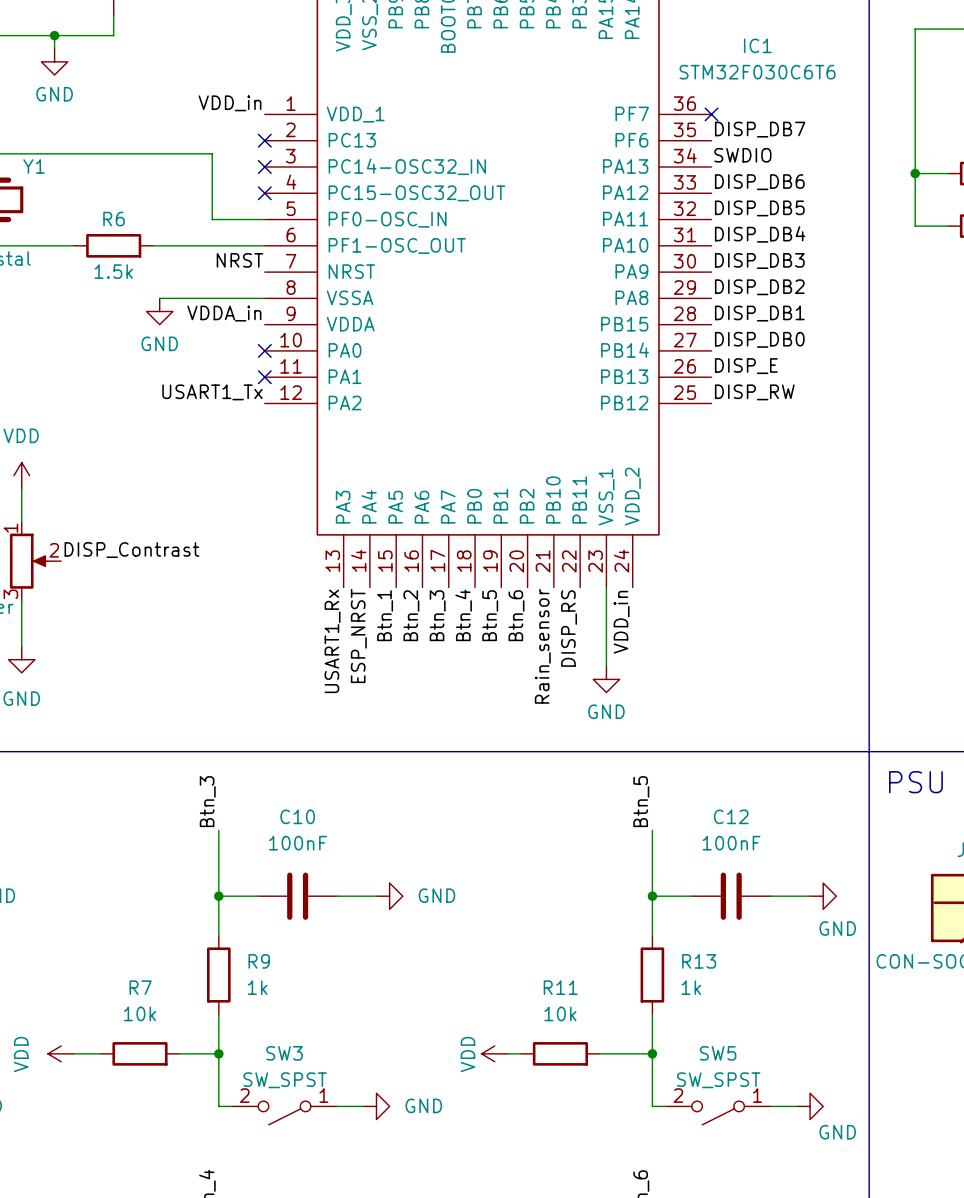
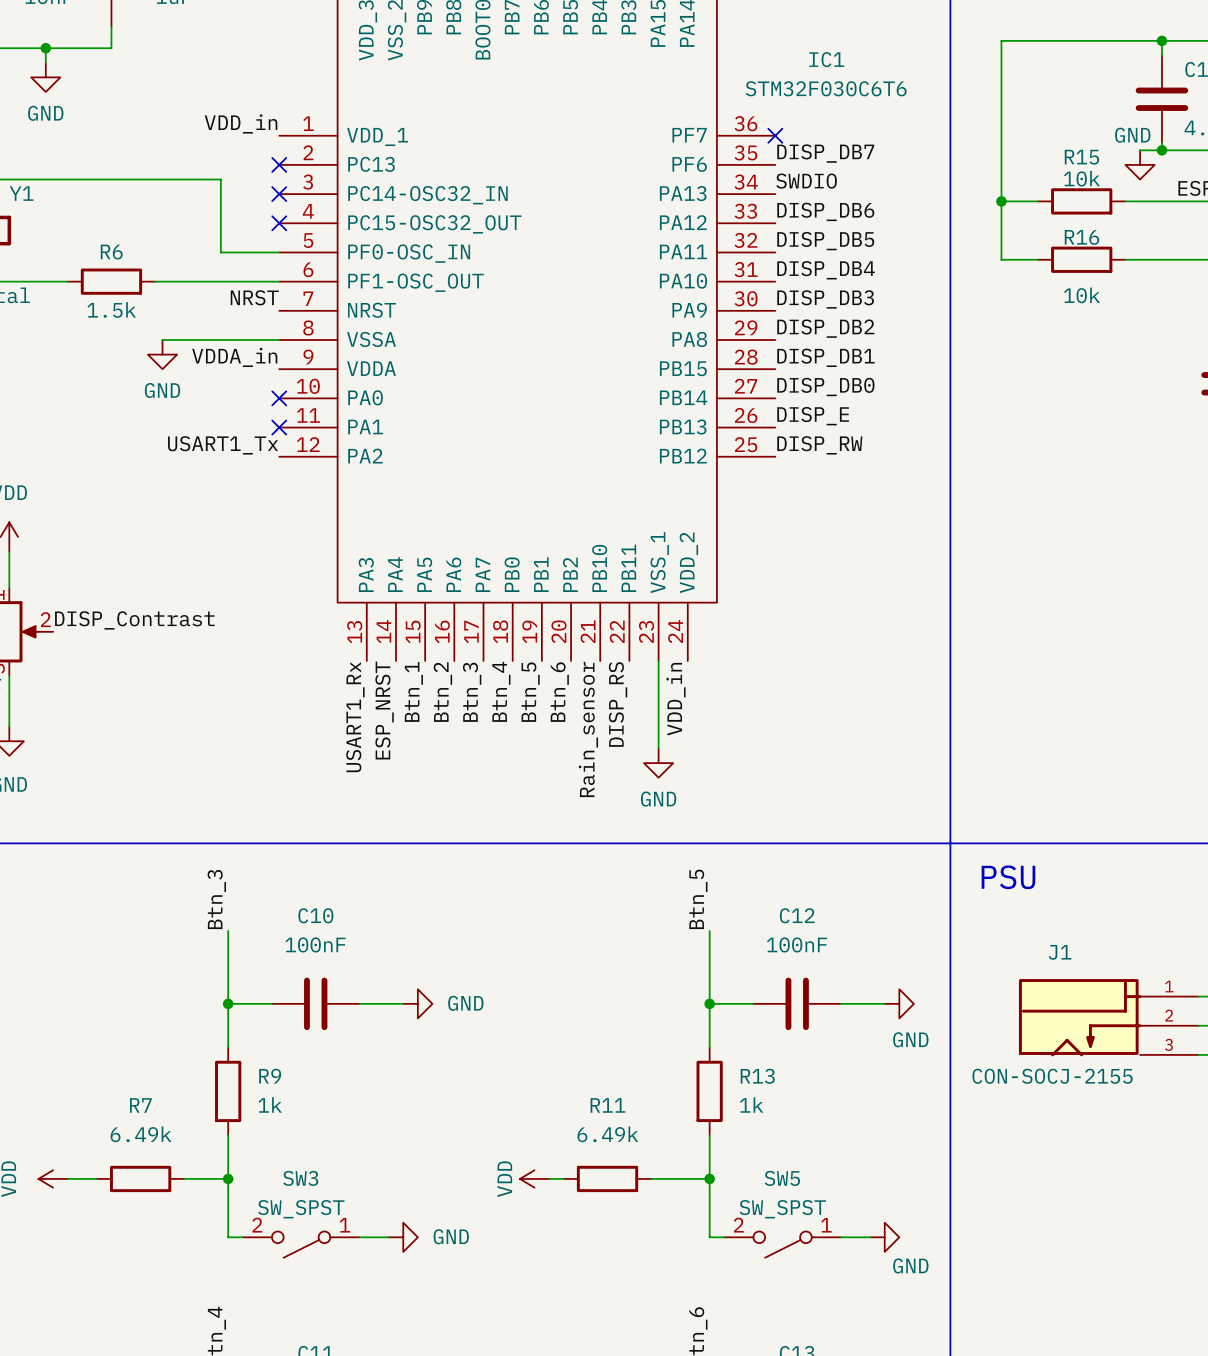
R7 value: 10k (139, 1013) -> 6.49k (141, 1134)
R11 value: 10k (560, 1013) -> 6.49k (607, 1134)

